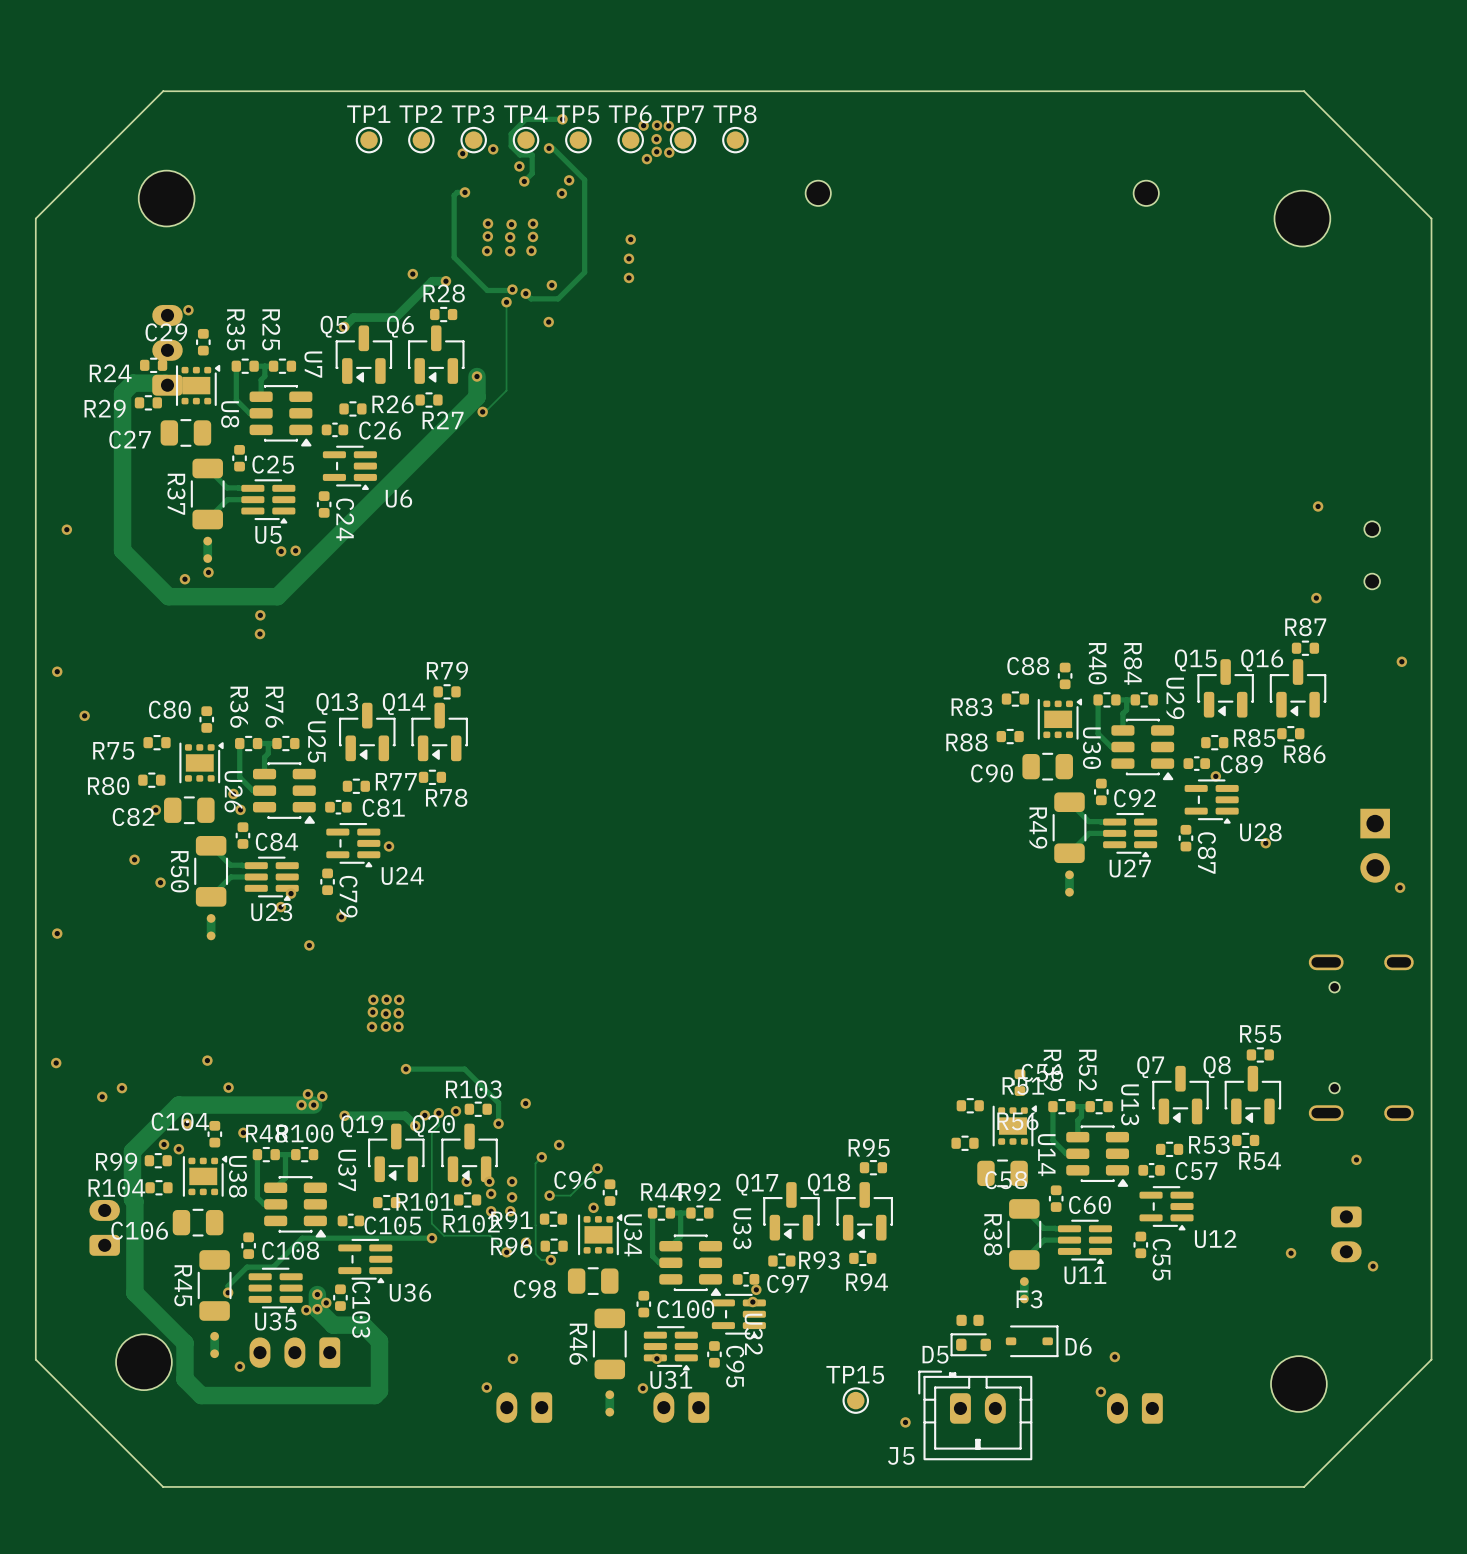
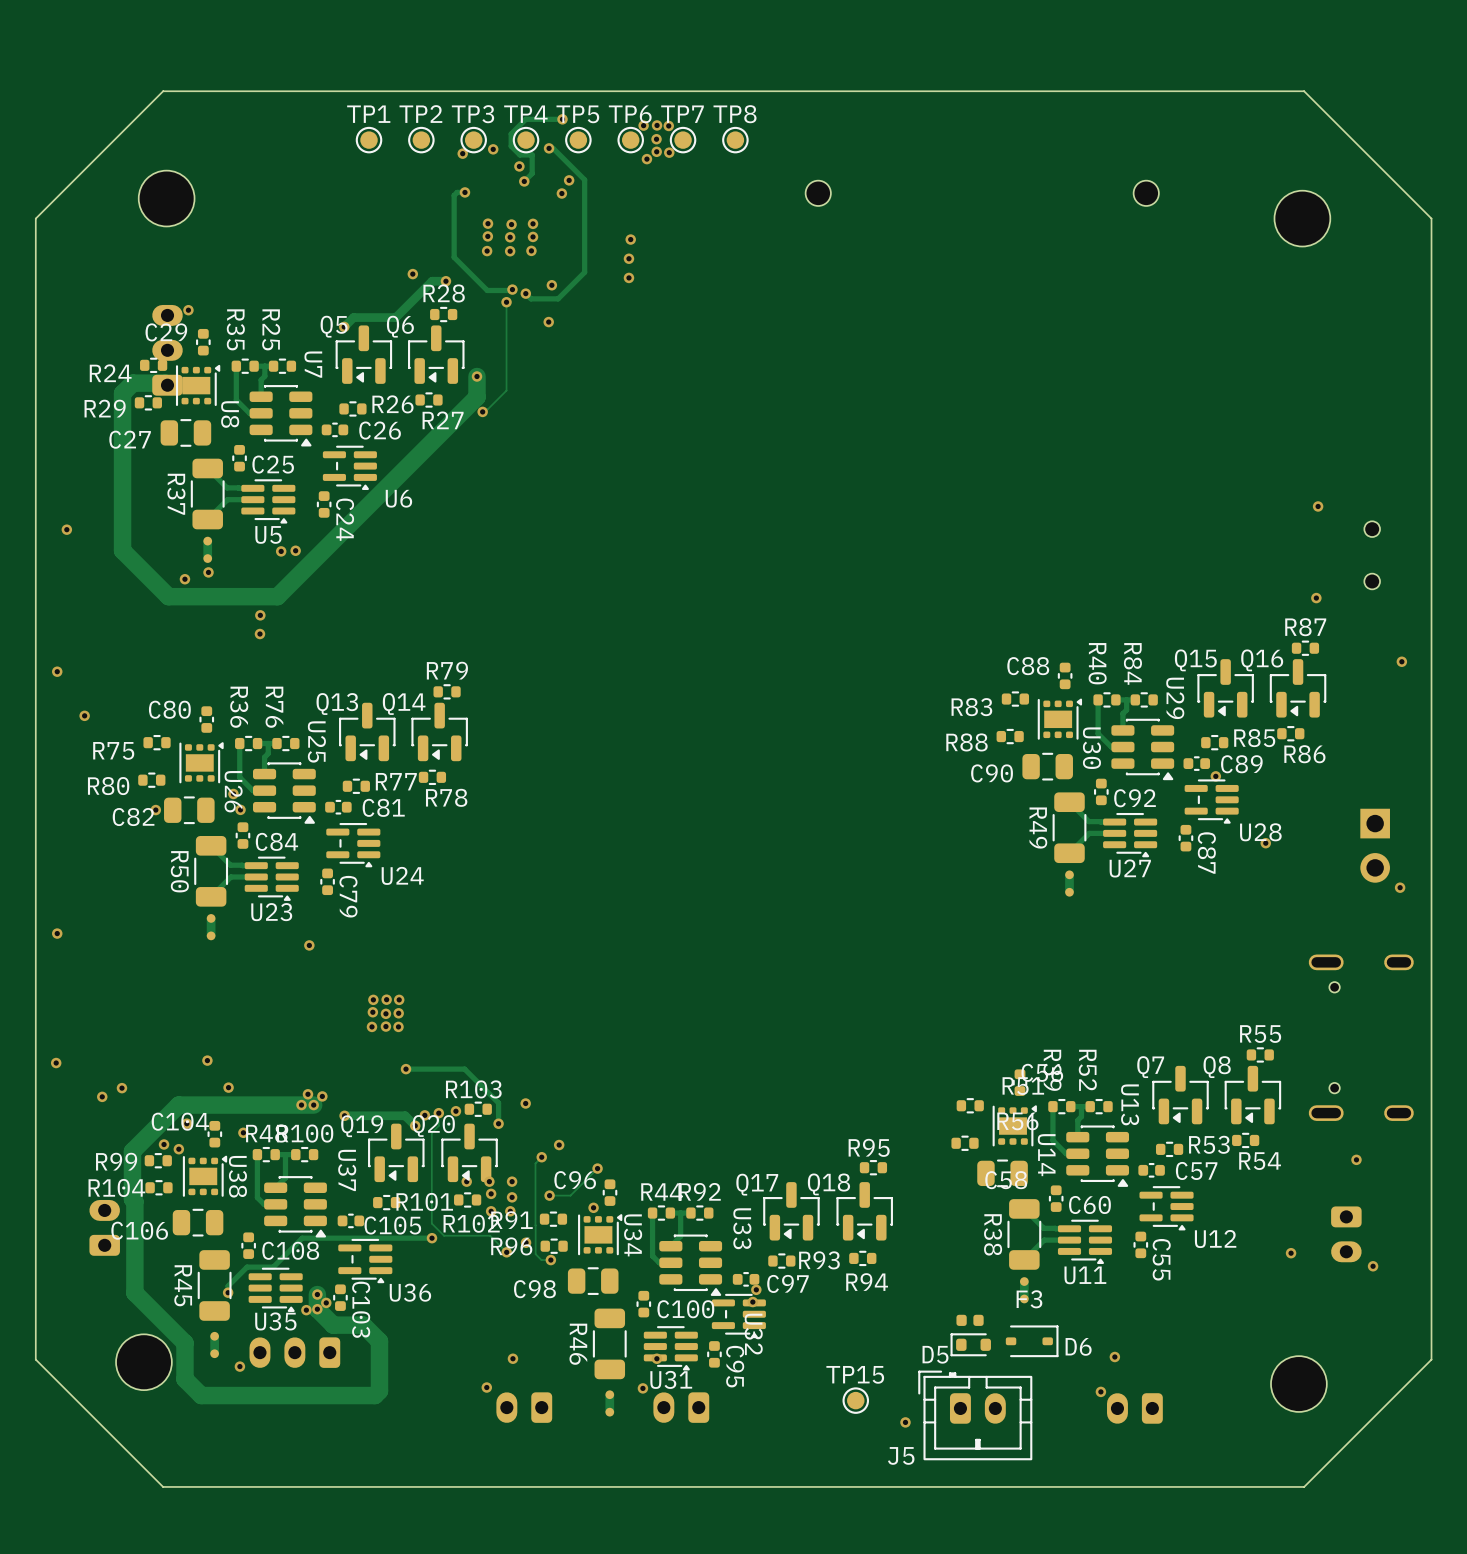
via: (389, 846) -> none
via: (134, 859) -> none
via: (160, 882) -> none
via: (291, 893) -> none
via: (280, 907) -> none
via: (341, 916) -> none

